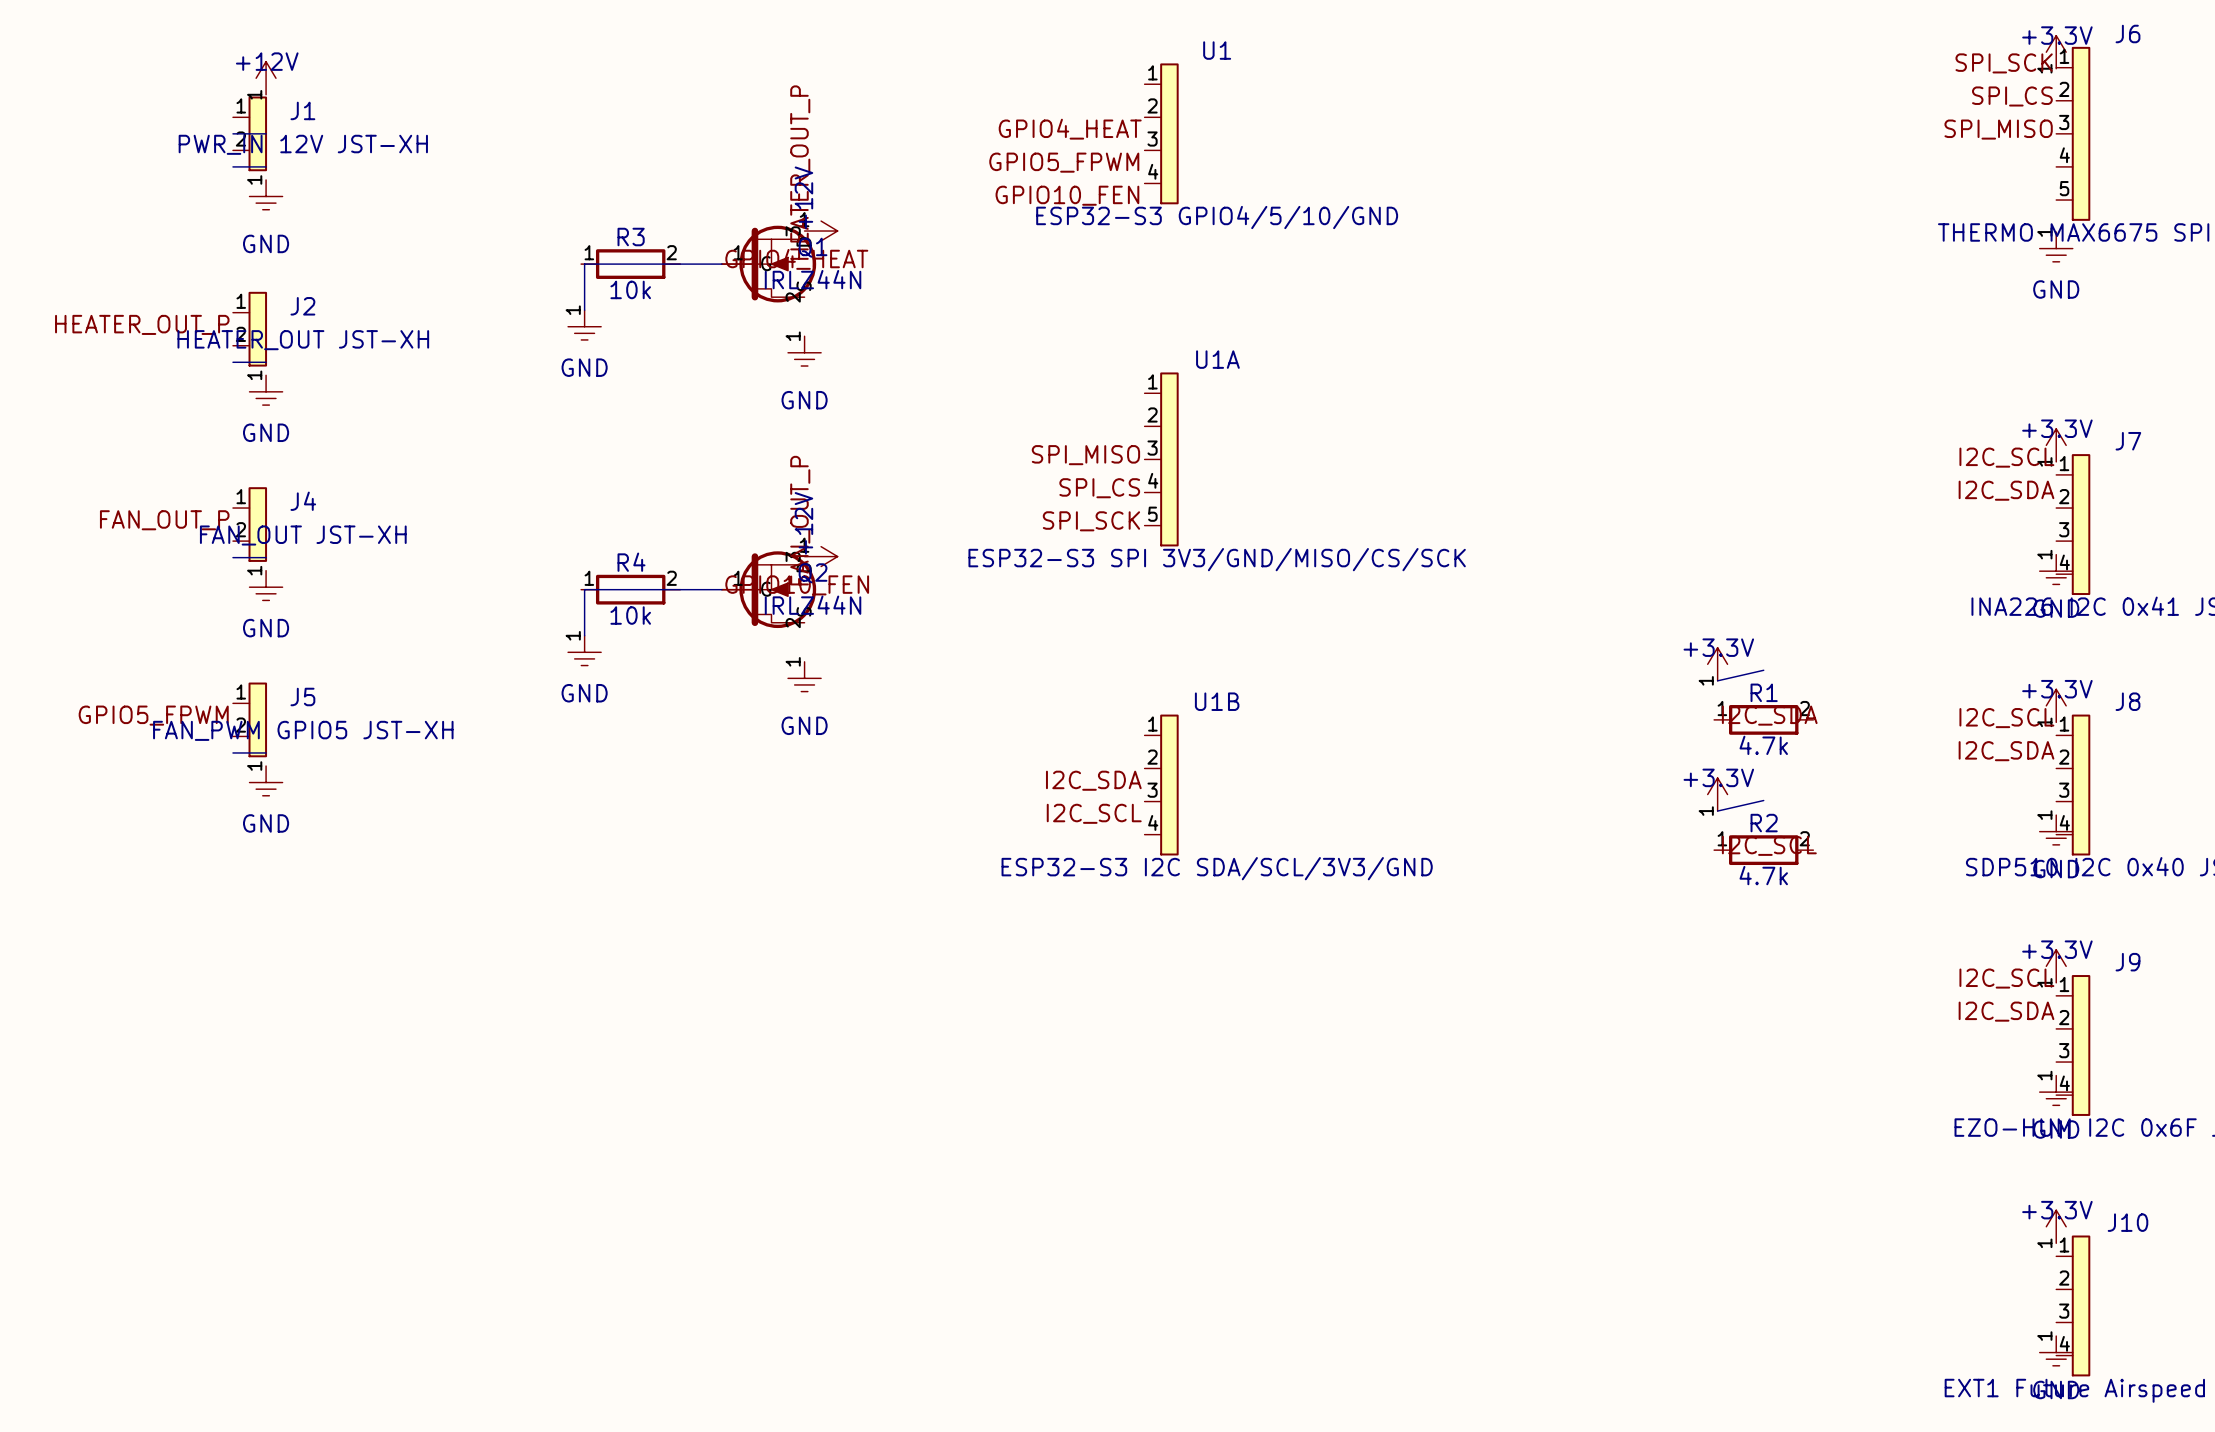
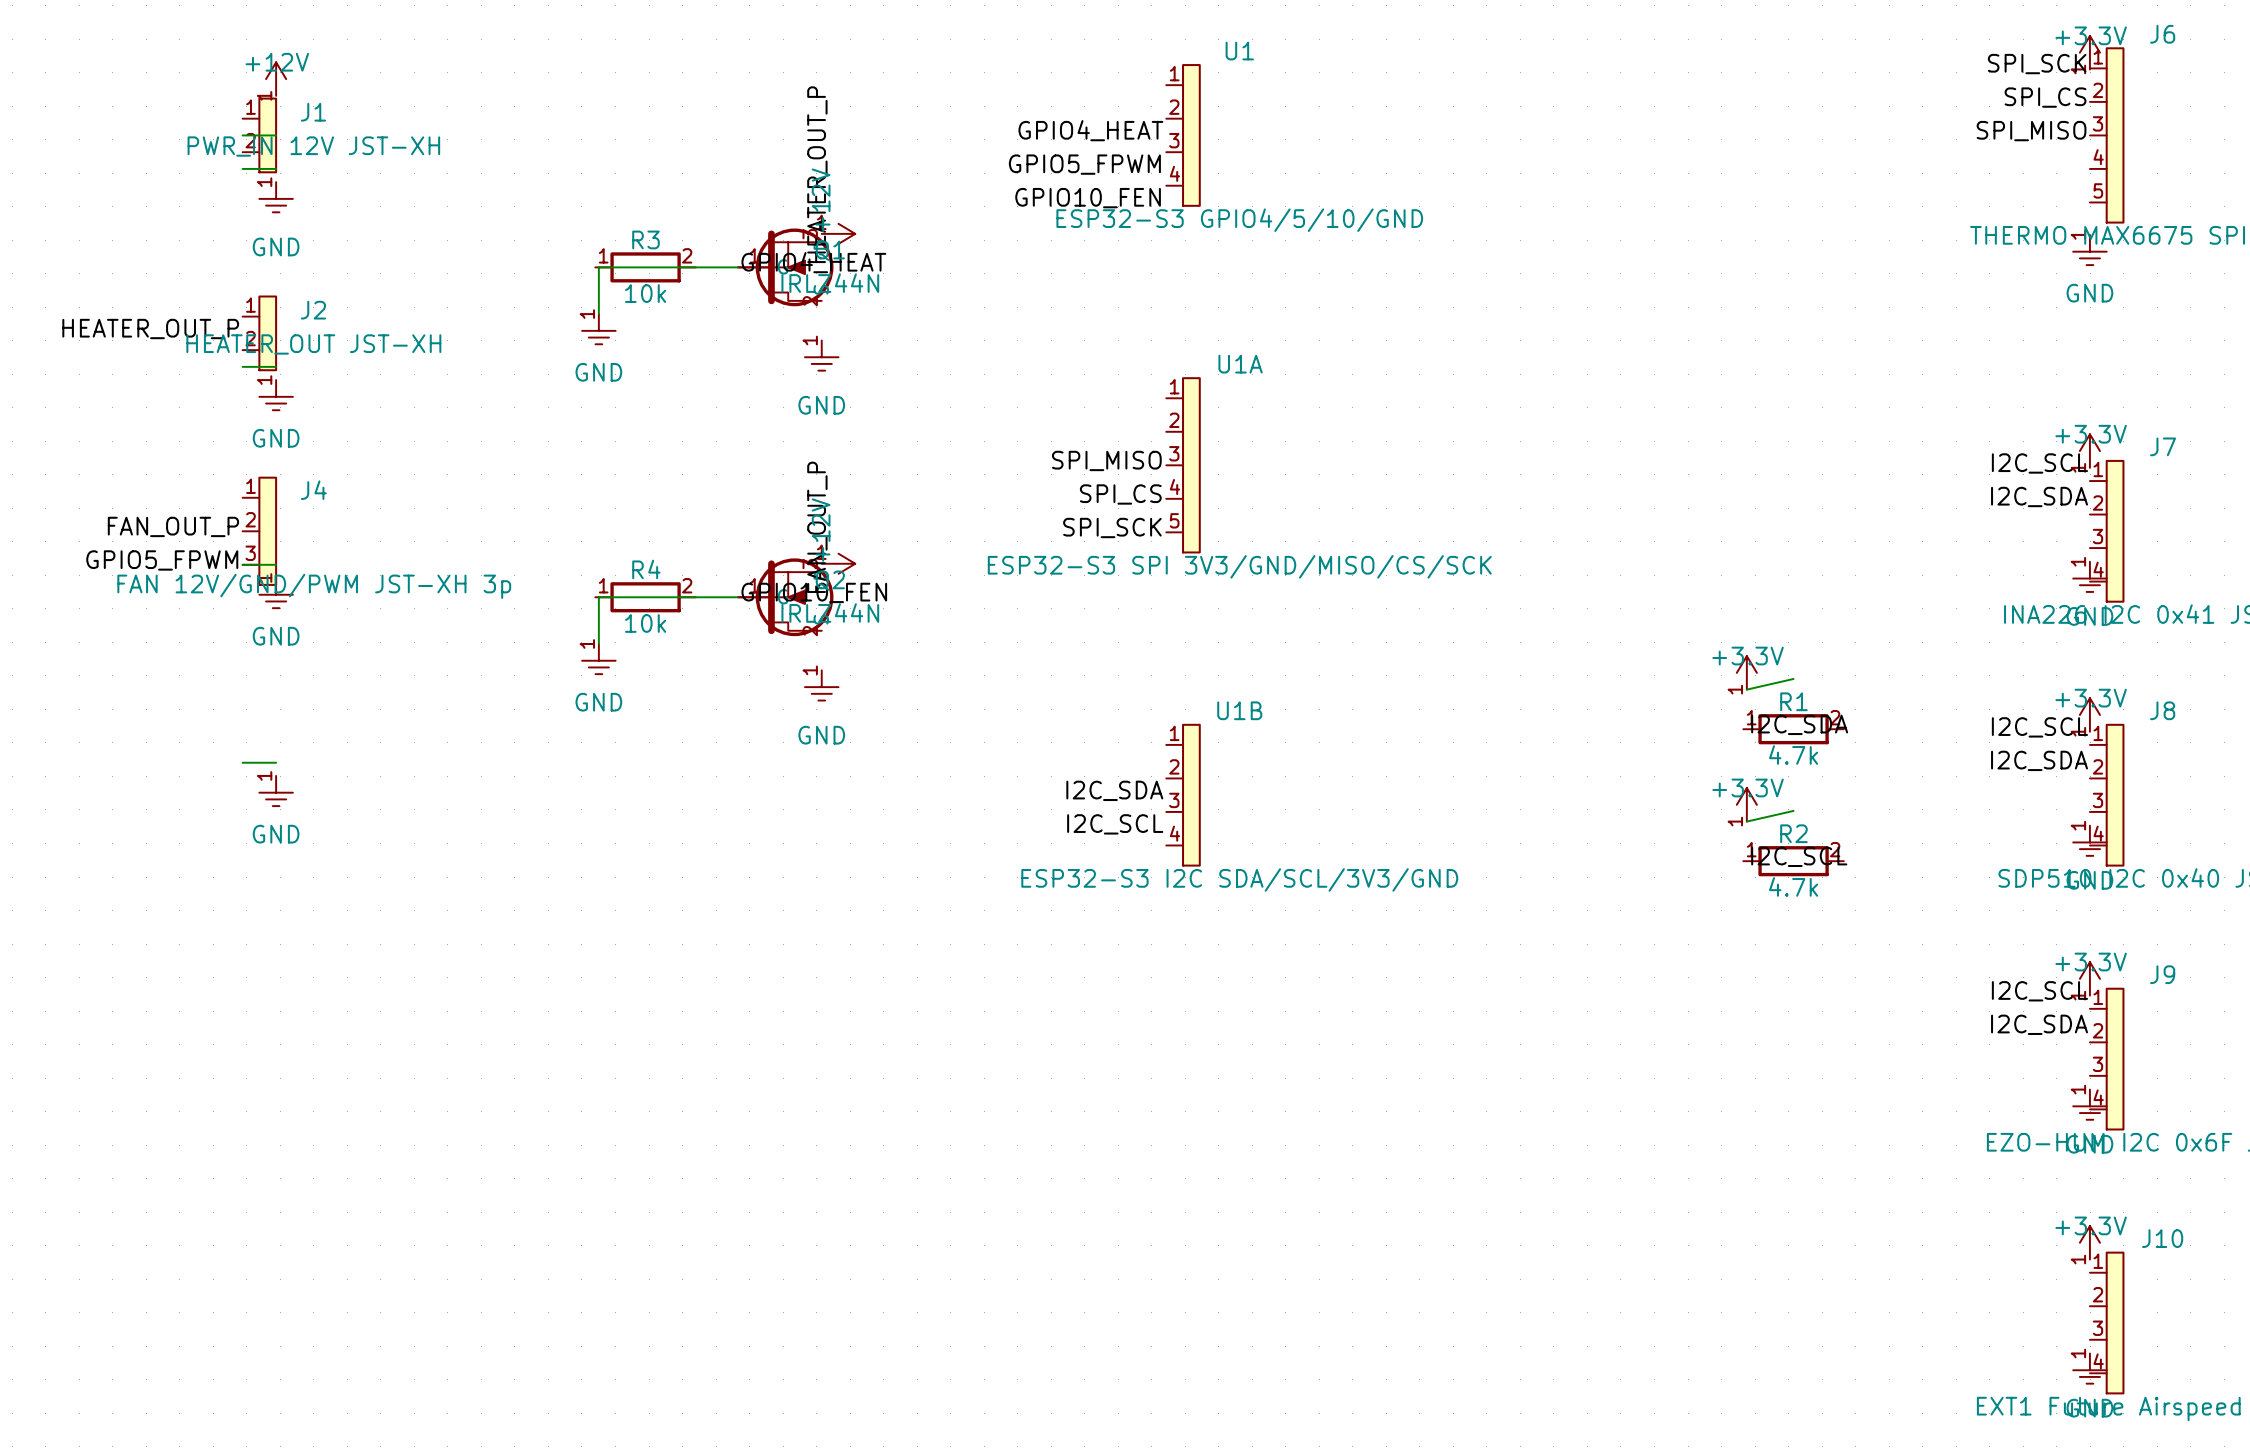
J4 symbol: [232, 487, 268, 562] -> [242, 476, 278, 586]
J4 value: FAN_OUT JST-XH (303, 535) -> FAN 12V/GND/PWM JST-XH 3p (314, 586)
label position: GPIO5_FPWM (153, 715) -> GPIO5_FPWM (162, 560)
J5: FAN_PWM GPIO5 JST-XH (250, 719) -> none

